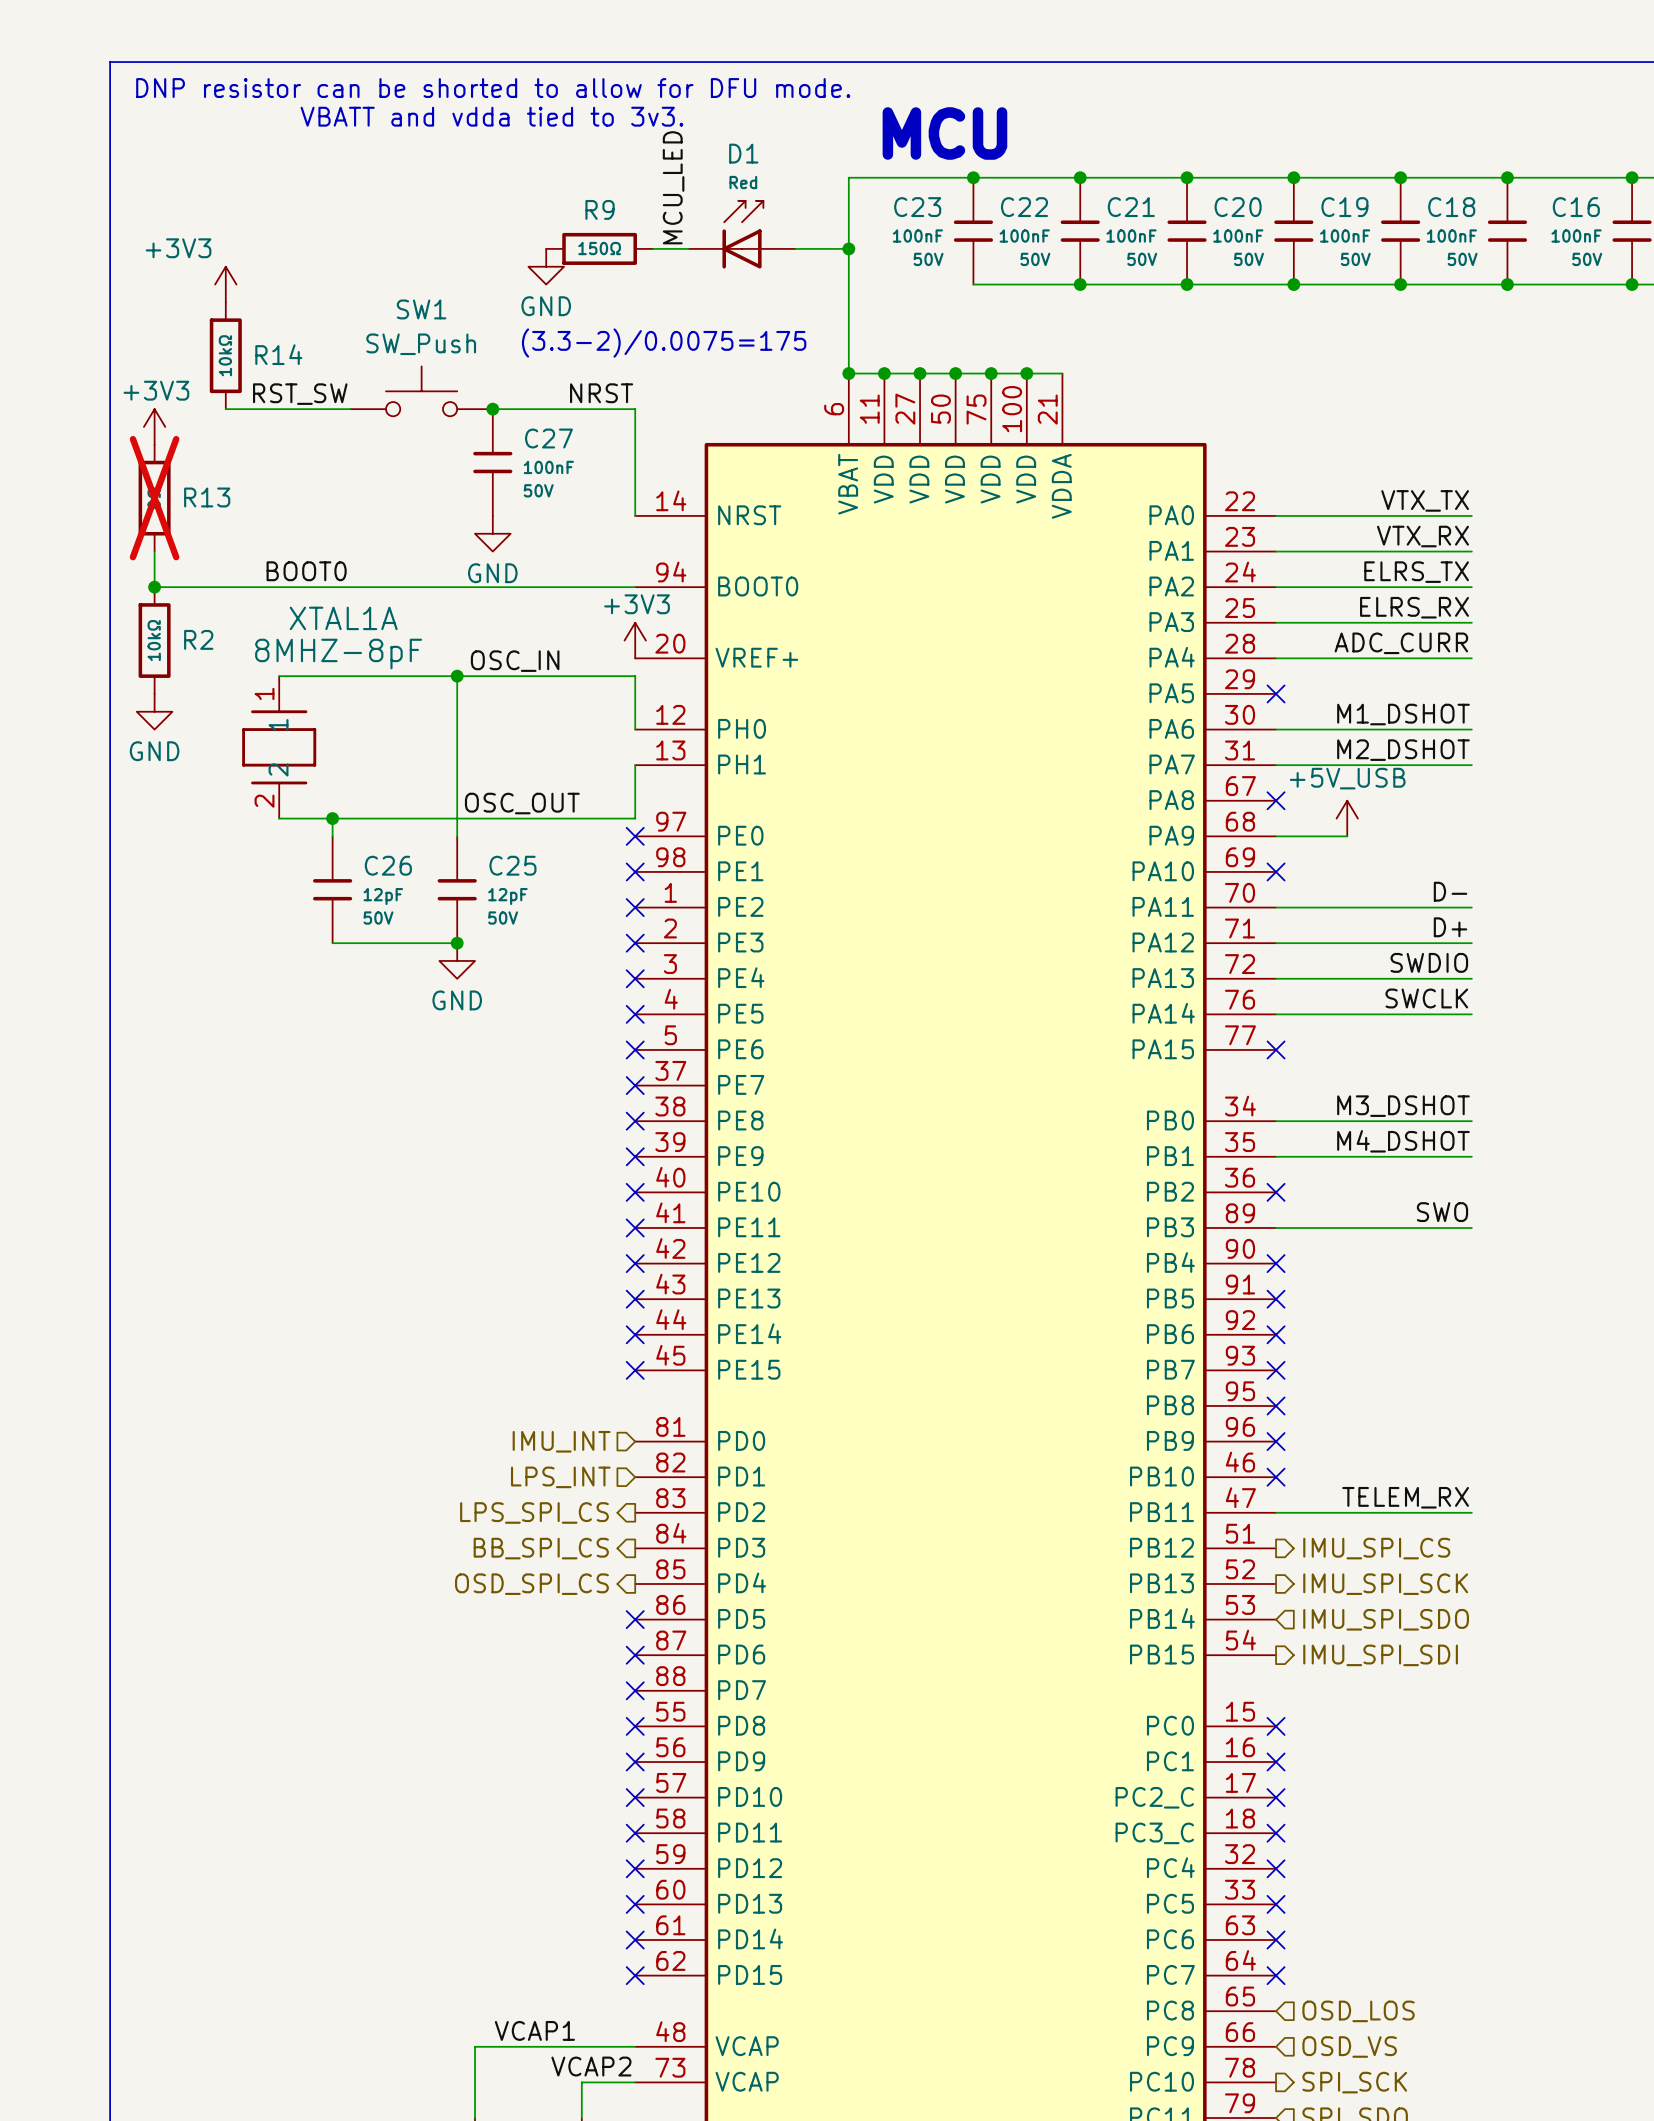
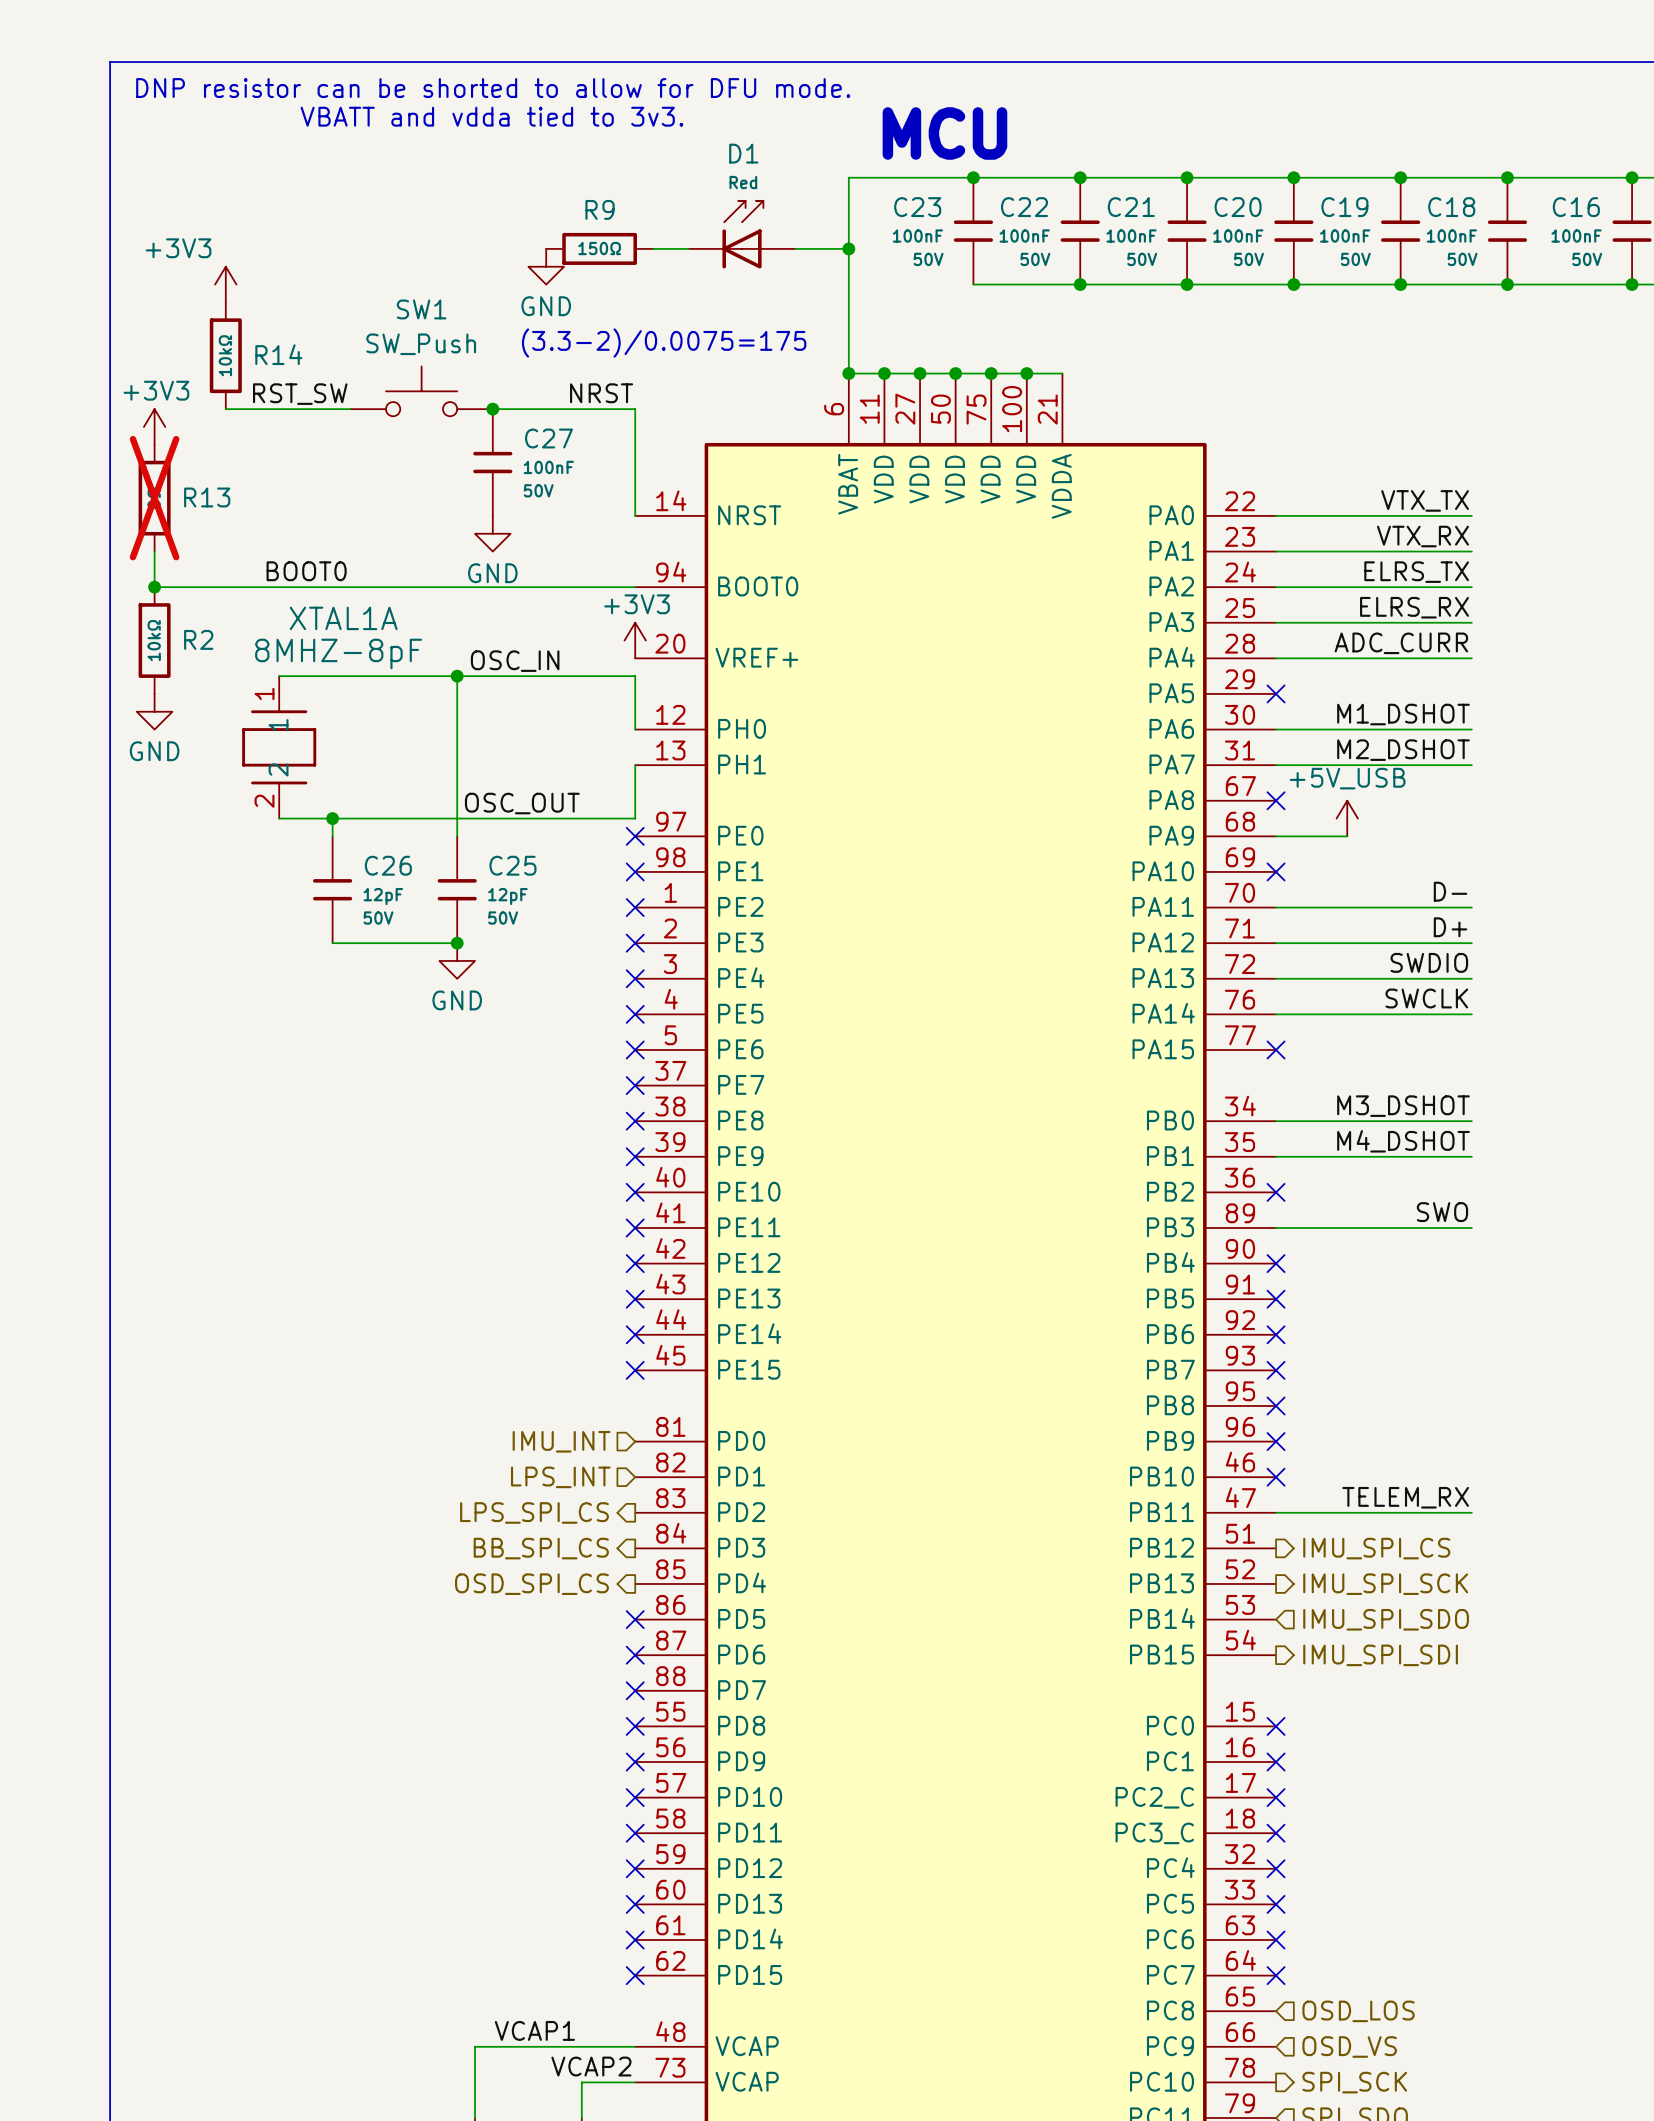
label: MCU_LED (673, 187) -> none

